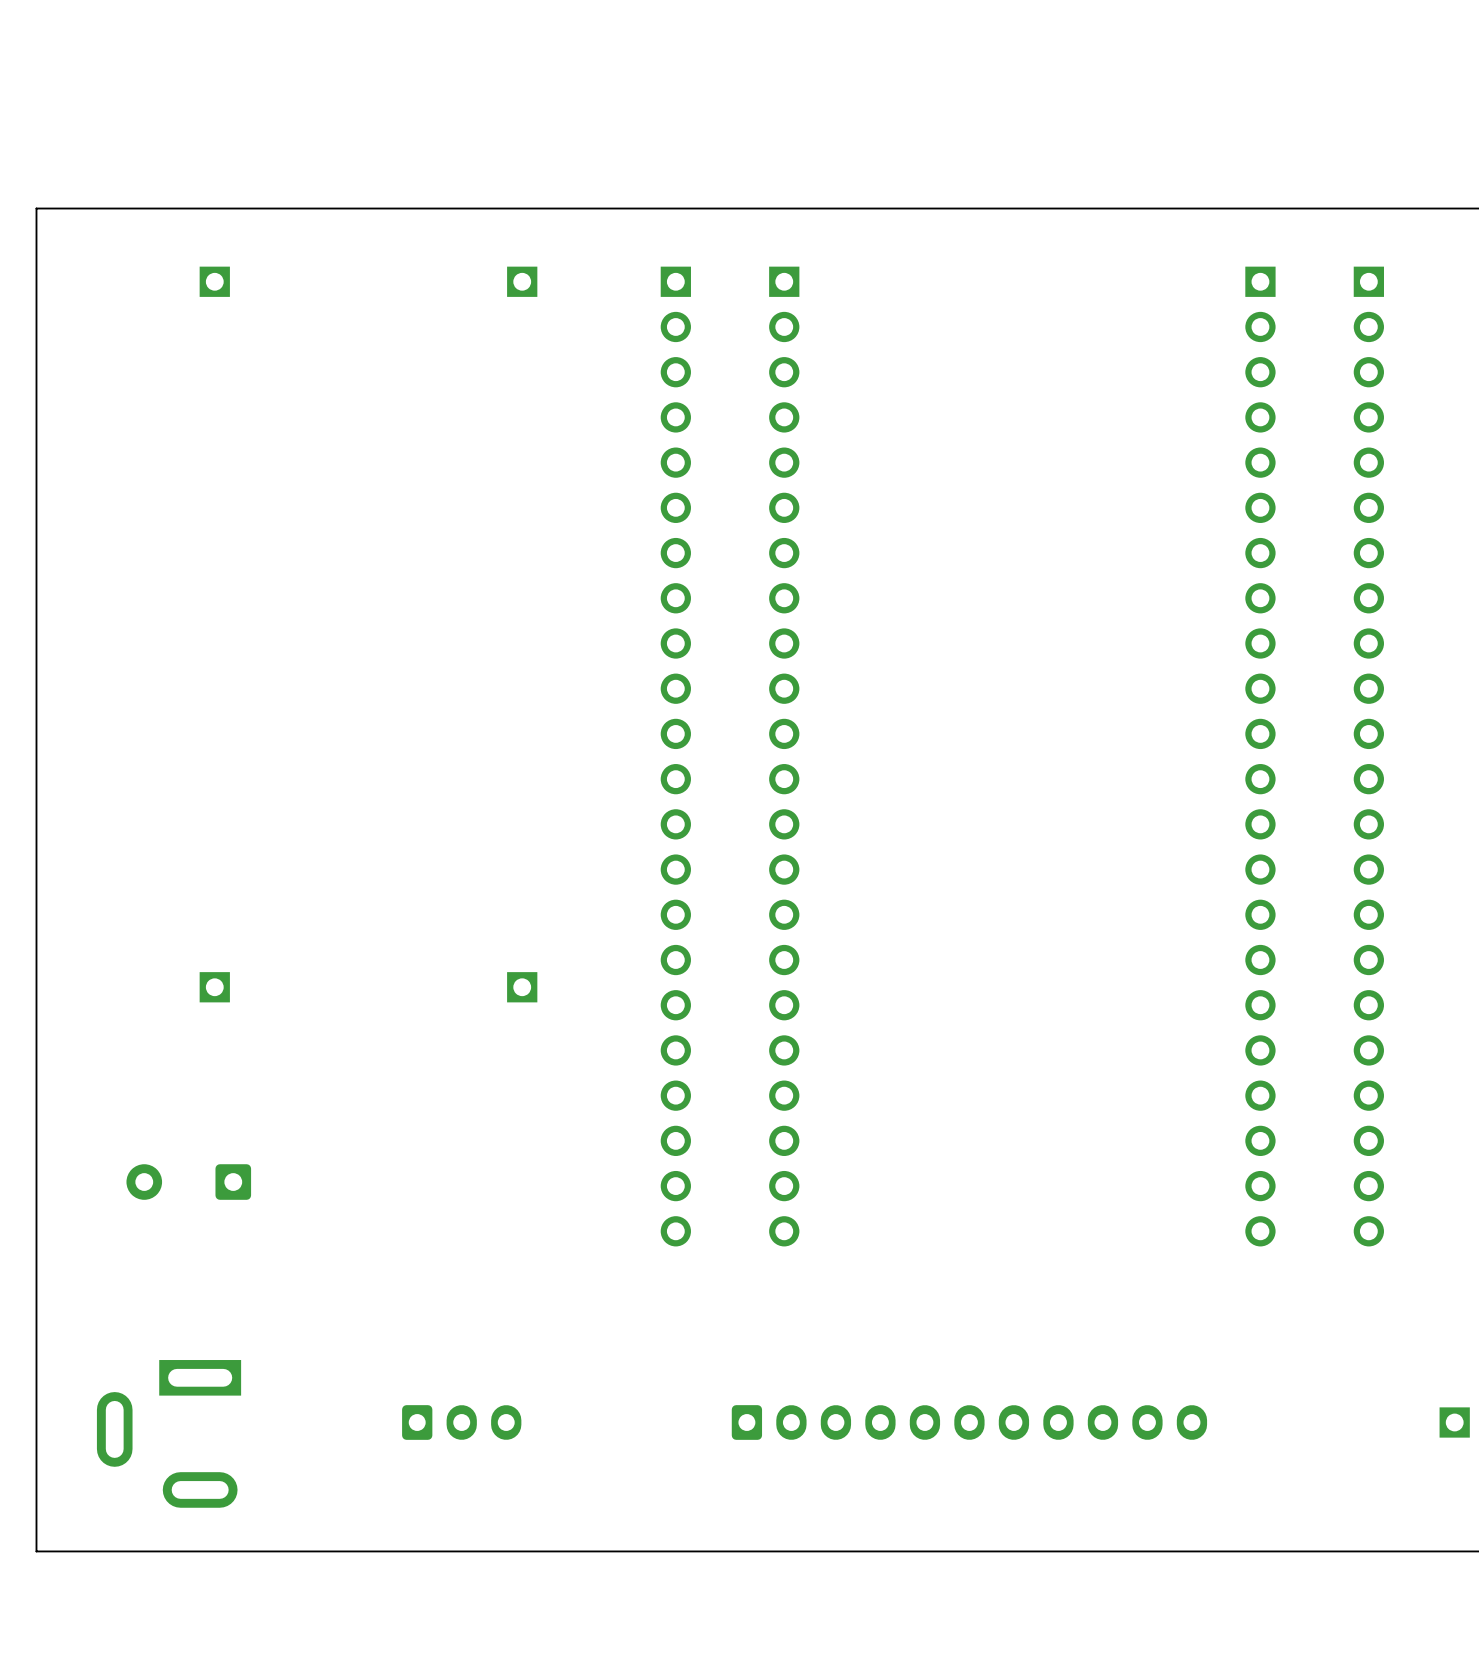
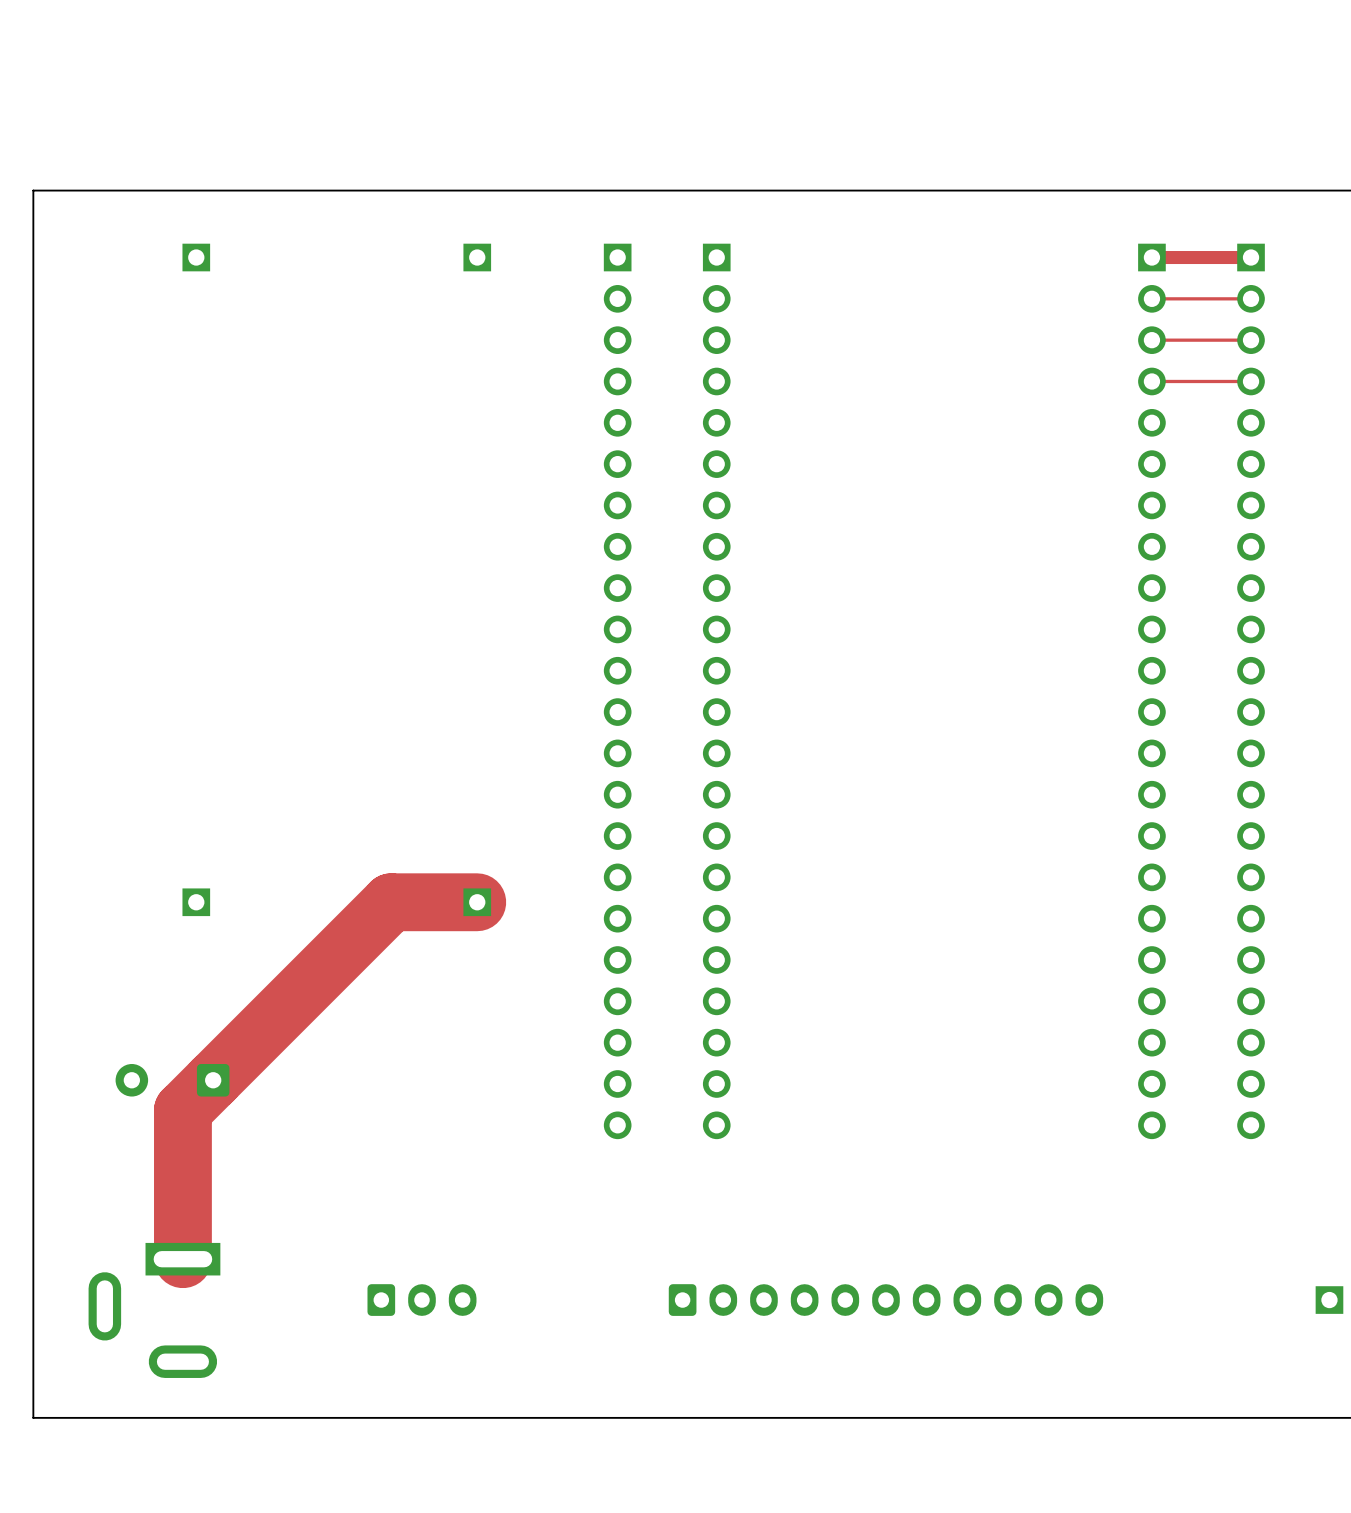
top track: none -> (1251, 257) (1151, 257)
top track: none -> (1251, 298) (1151, 298)
top track: none -> (1251, 340) (1151, 340)
top track: none -> (1251, 381) (1151, 381)
top track: none -> (477, 902) (391, 902) (182, 1110) (182, 1259)

